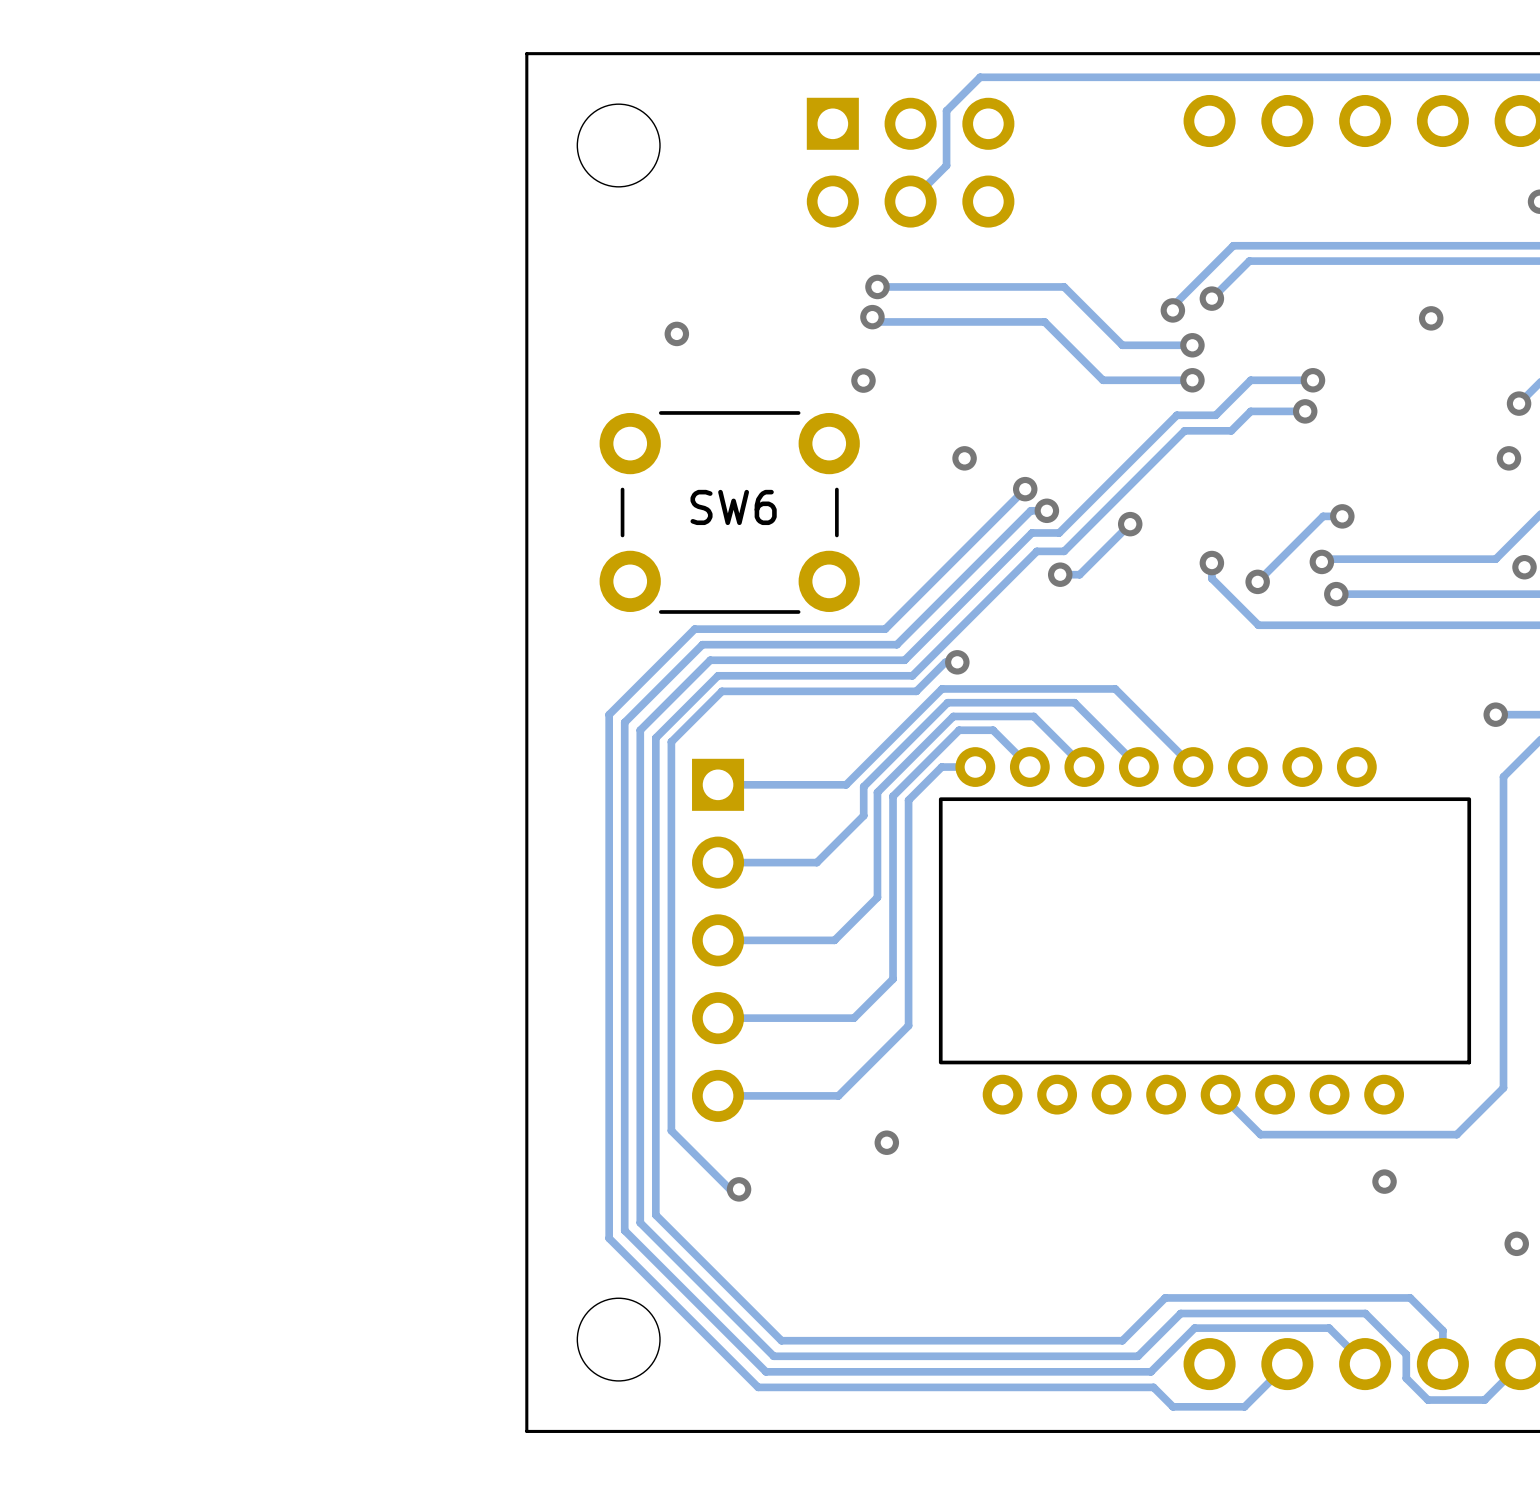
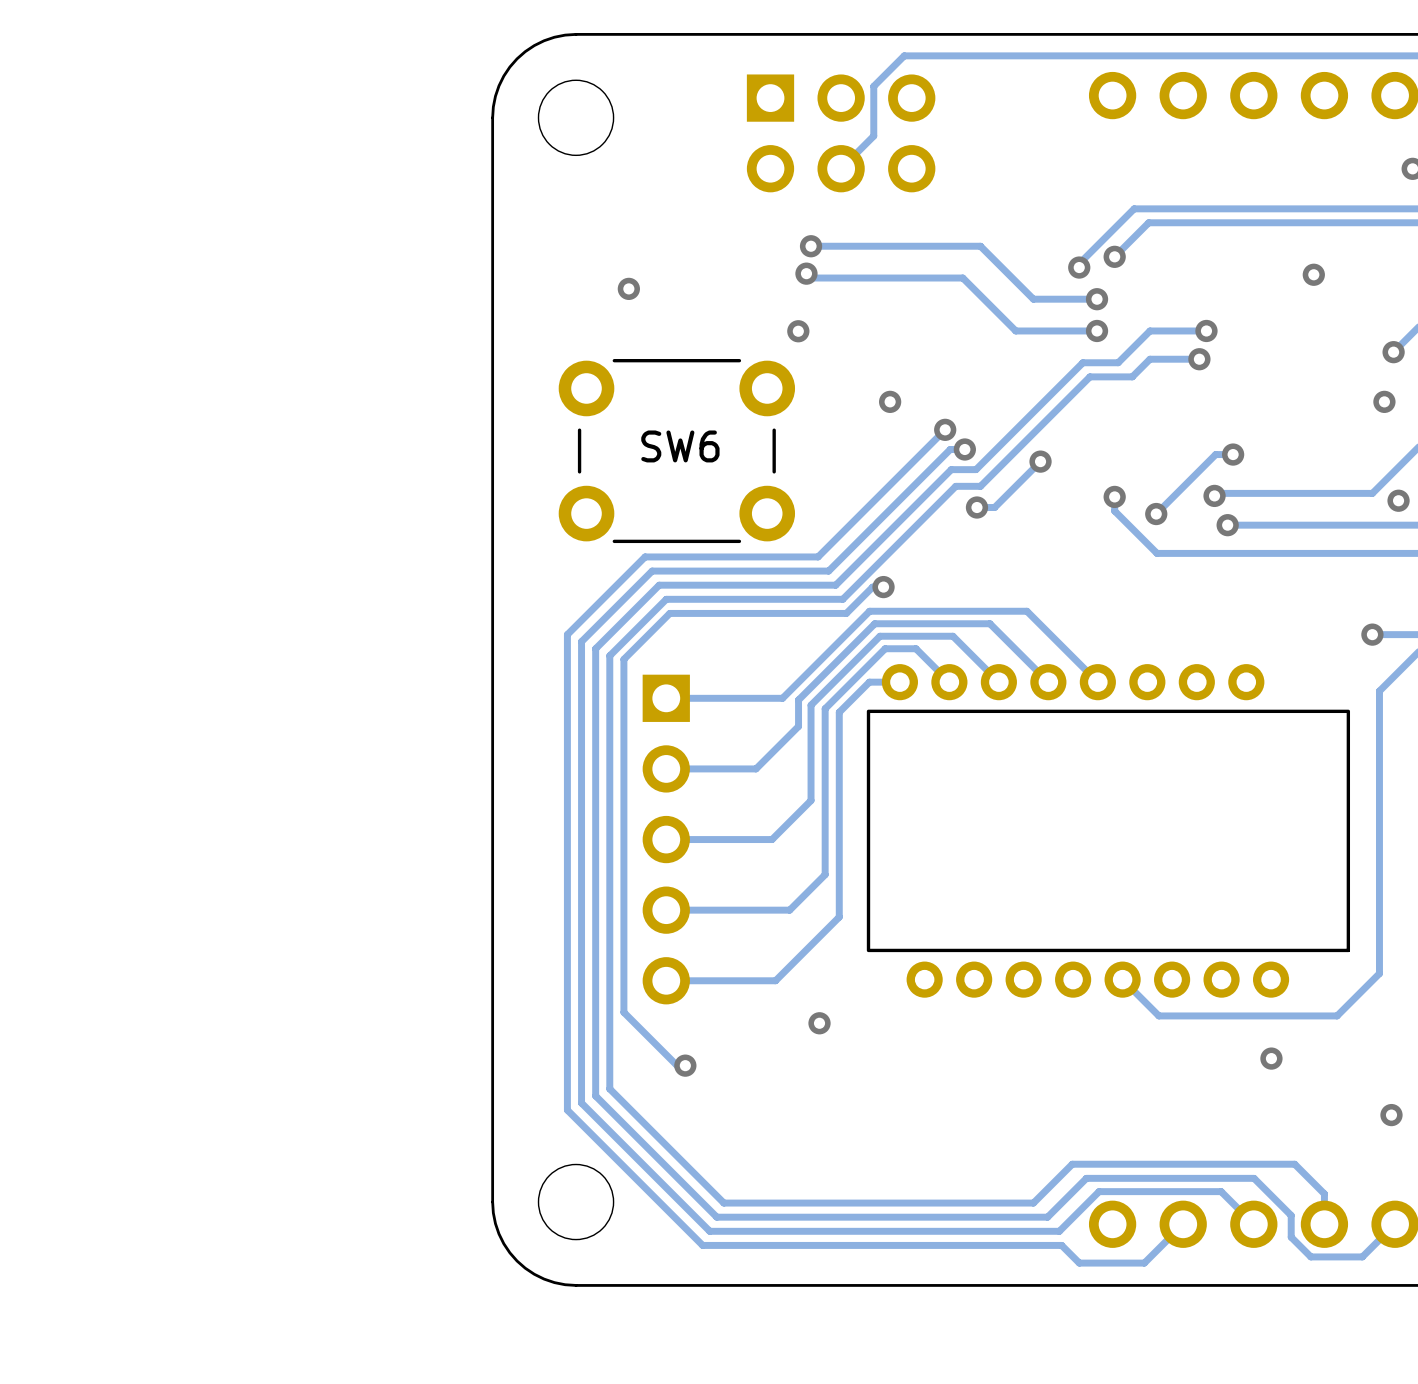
board edge: (618, 53) (526, 53) (526, 145) -> (576, 34) (544, 40) (517, 58) (498, 85) (492, 117)
board edge: (526, 1339) (526, 1431) (618, 1431) -> (492, 1202) (498, 1233) (517, 1261) (544, 1279) (576, 1285)

